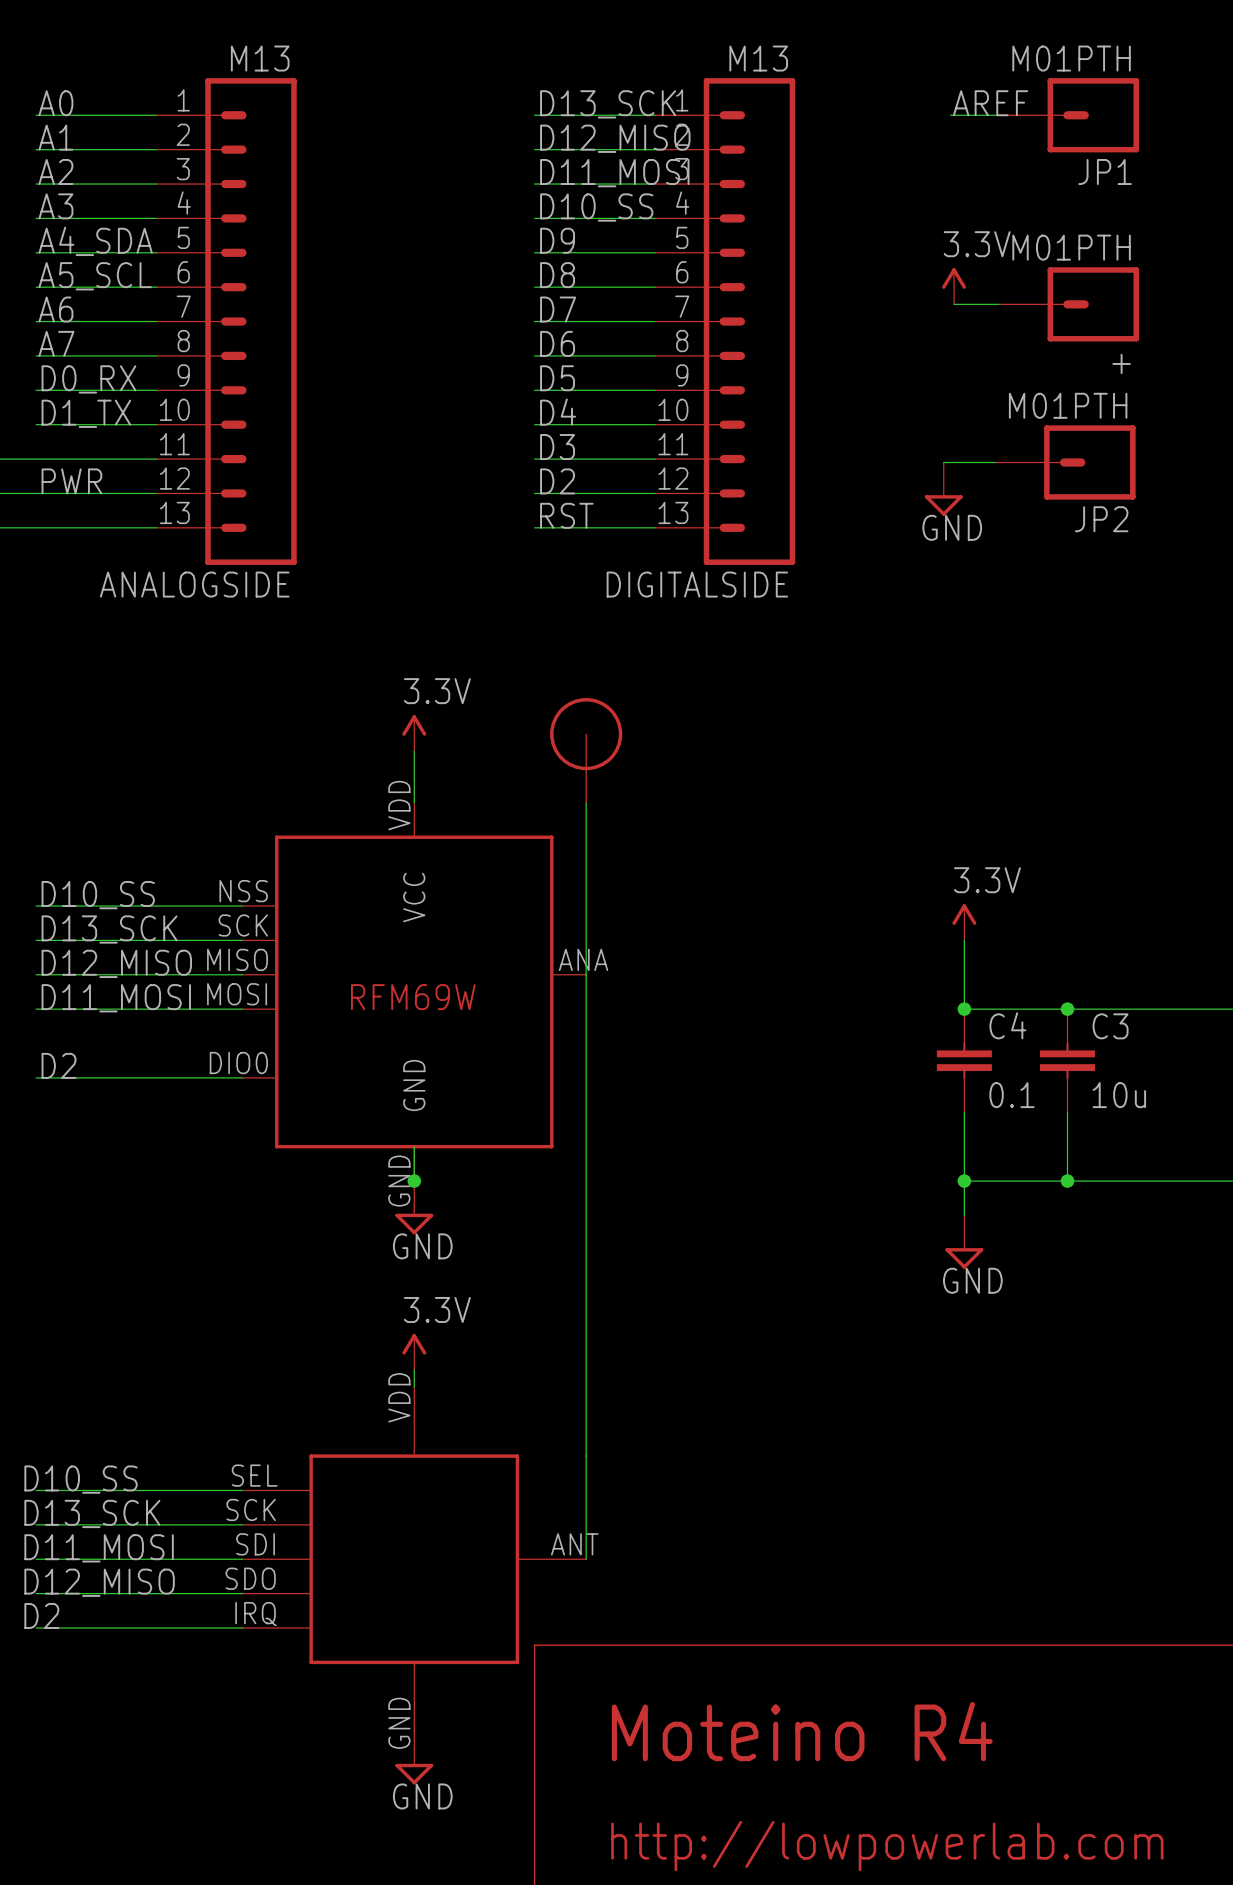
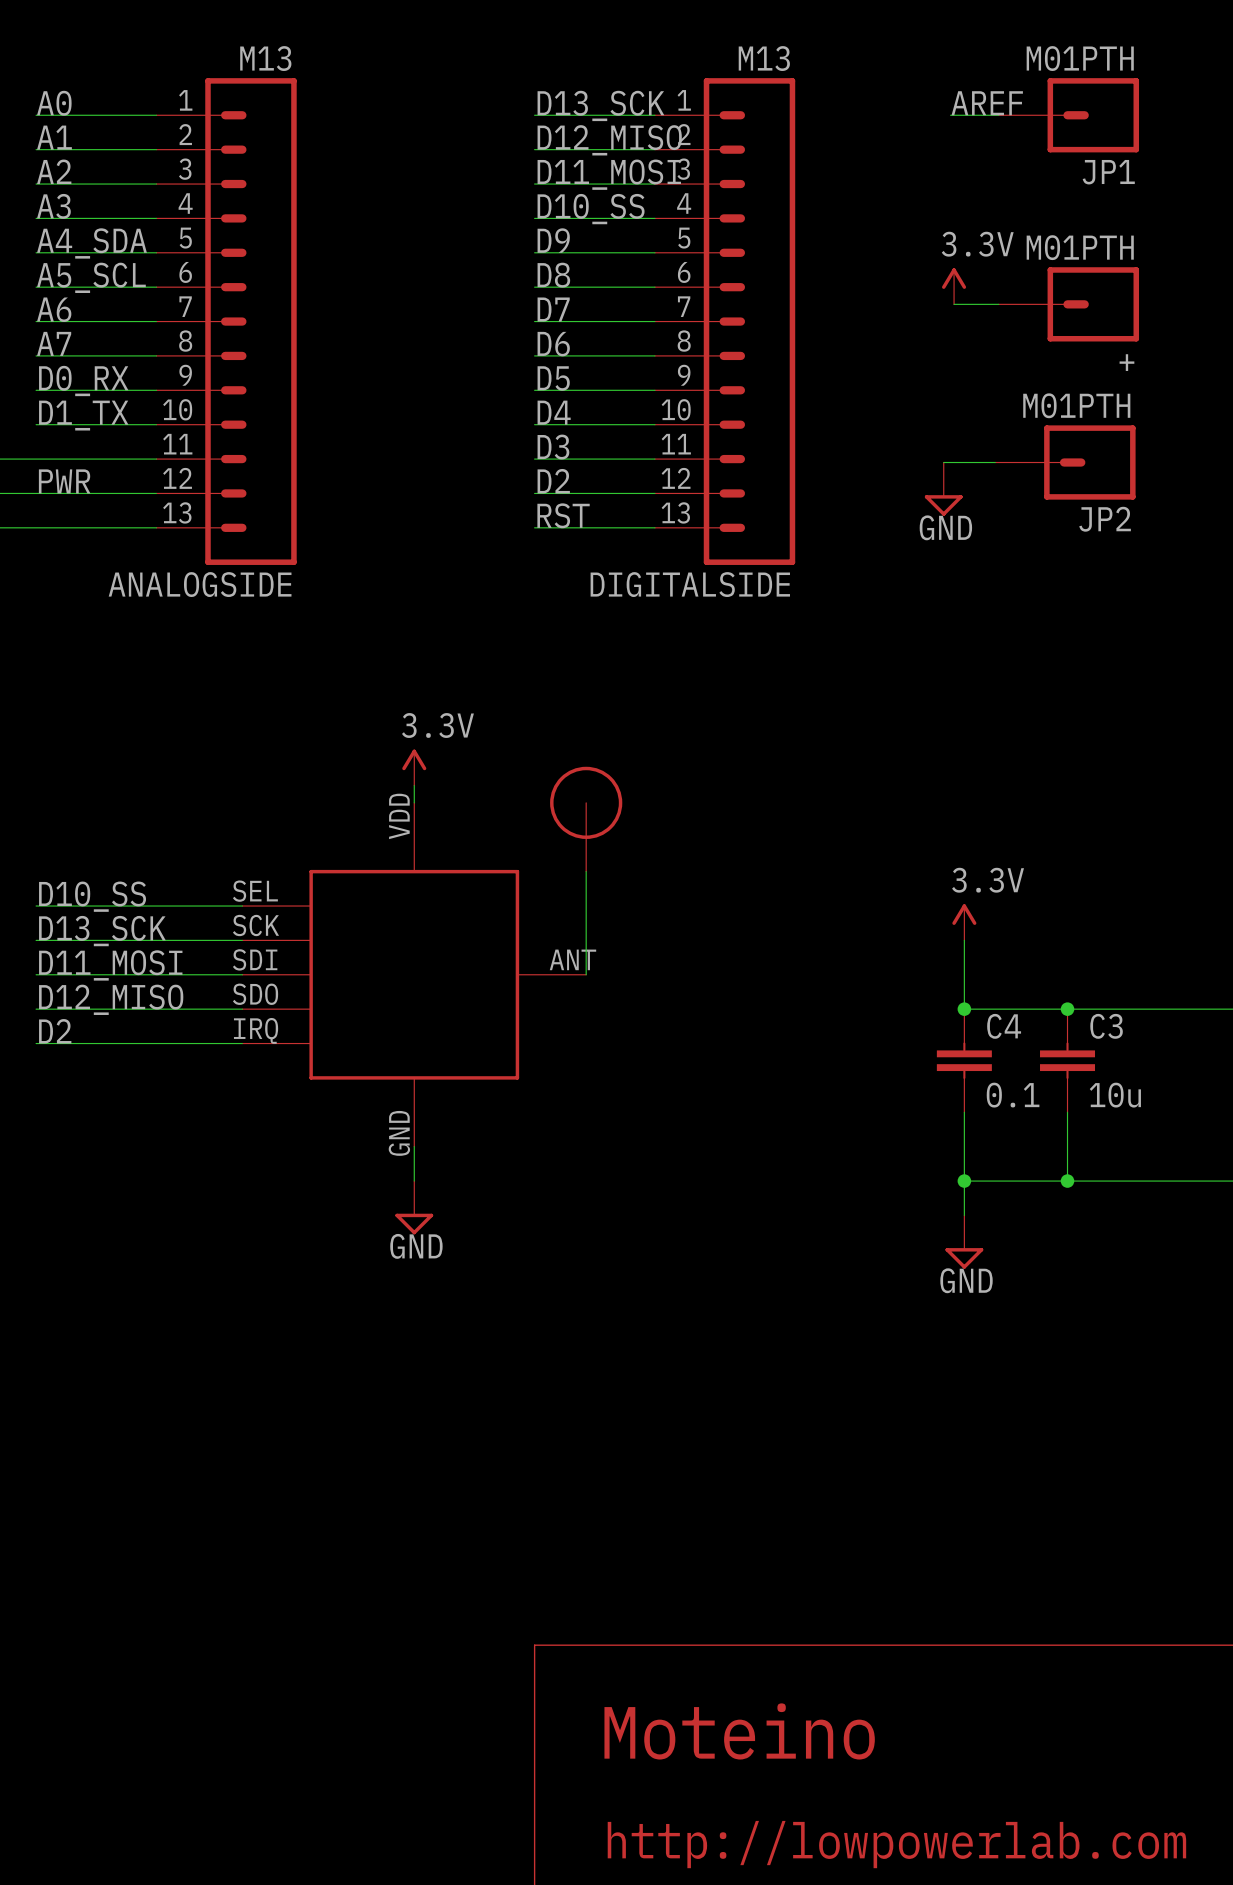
power symbol position: 3.3V (414, 733) -> 3.3V (414, 767)
part position: (586, 750) -> (586, 819)
label: D12_MISO (116, 963) -> D11_MOSI (110, 965)
part: none -> (414, 974)
wire: (586, 974) (586, 1559) -> none
part: (414, 991) -> none
label: D11_MOSI (116, 998) -> D12_MISO (111, 999)
label position: D2 (59, 1065) -> D2 (55, 1031)
wire: (36, 1077) (242, 1077) -> (36, 1043) (242, 1043)
junction: (414, 1181) -> none
power symbol: 3.3V (414, 1352) -> none
wire: (414, 1370) (414, 1387) -> none
label: D10_SS (81, 1479) -> none
wire: (36, 1490) (242, 1490) -> none
label: D13_SCK (92, 1513) -> none
wire: (36, 1524) (242, 1524) -> none
label: D11_MOSI (99, 1548) -> none
wire: (36, 1559) (242, 1559) -> none
part: (414, 1559) -> none
label: D12_MISO (99, 1582) -> none
wire: (36, 1593) (242, 1593) -> none
label: D2 (41, 1615) -> none
wire: (36, 1628) (242, 1628) -> none
text: Moteino R4 (802, 1731) -> Moteino (739, 1731)
power symbol: GND (414, 1757) -> none

